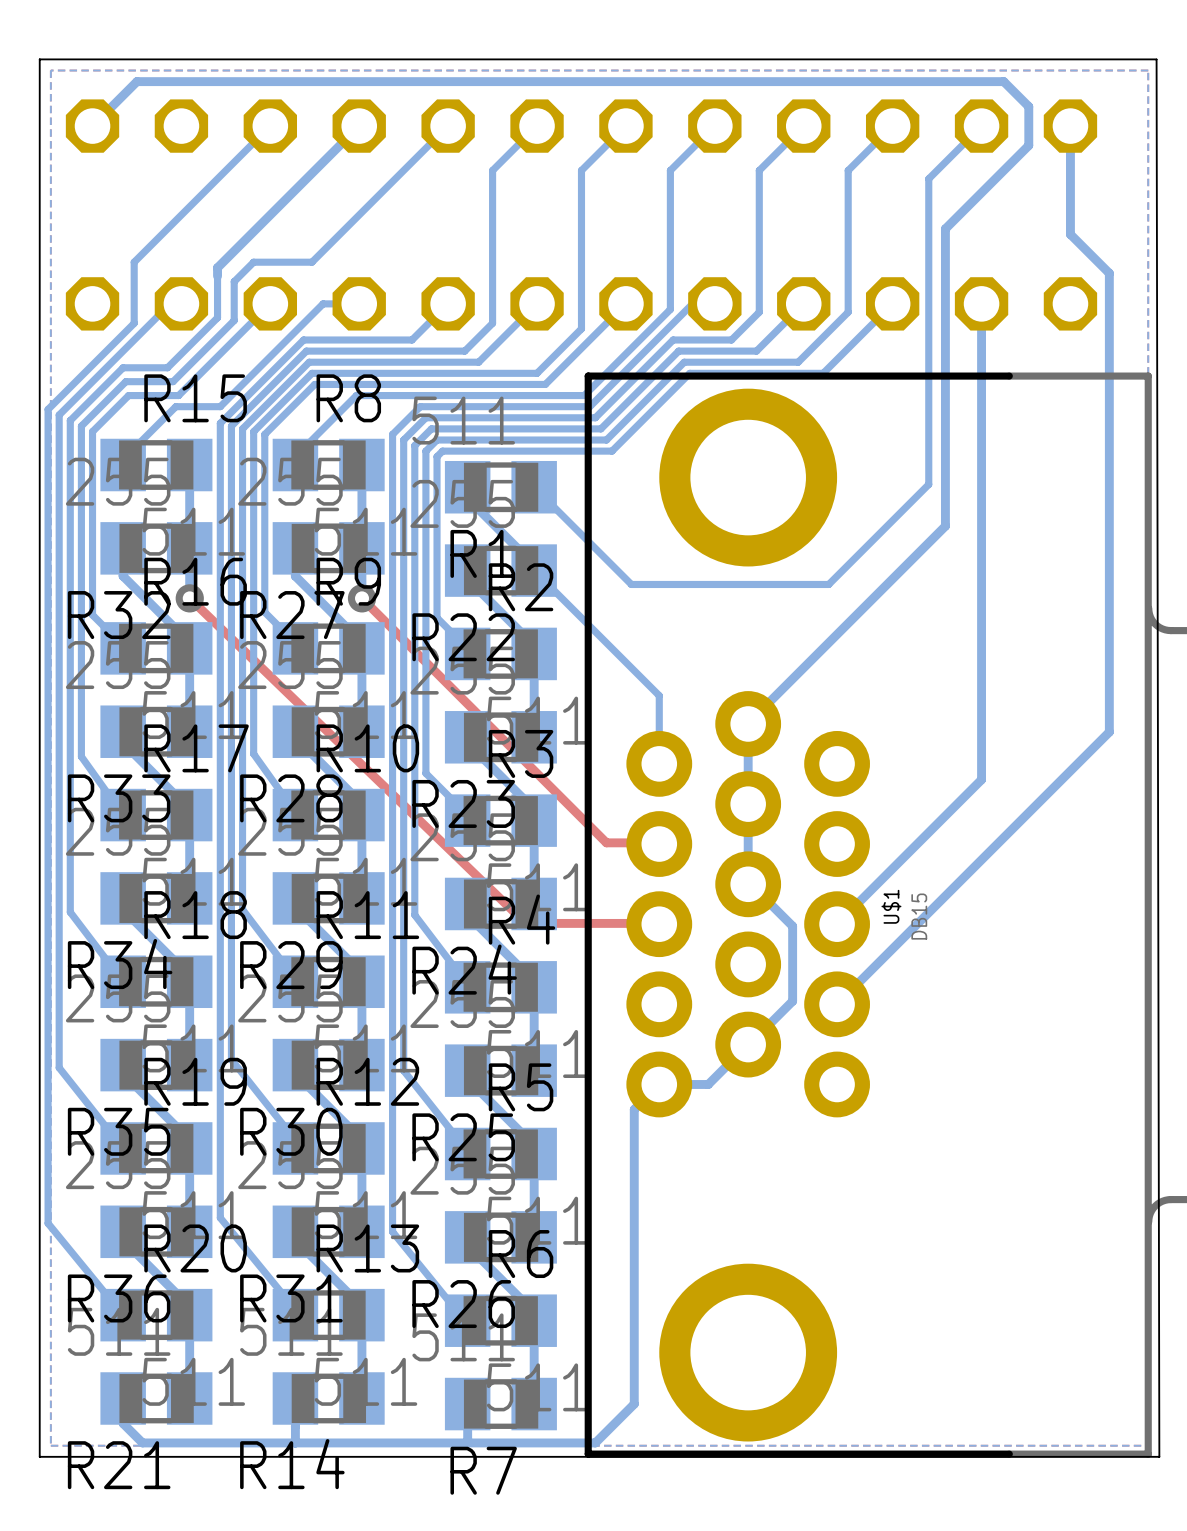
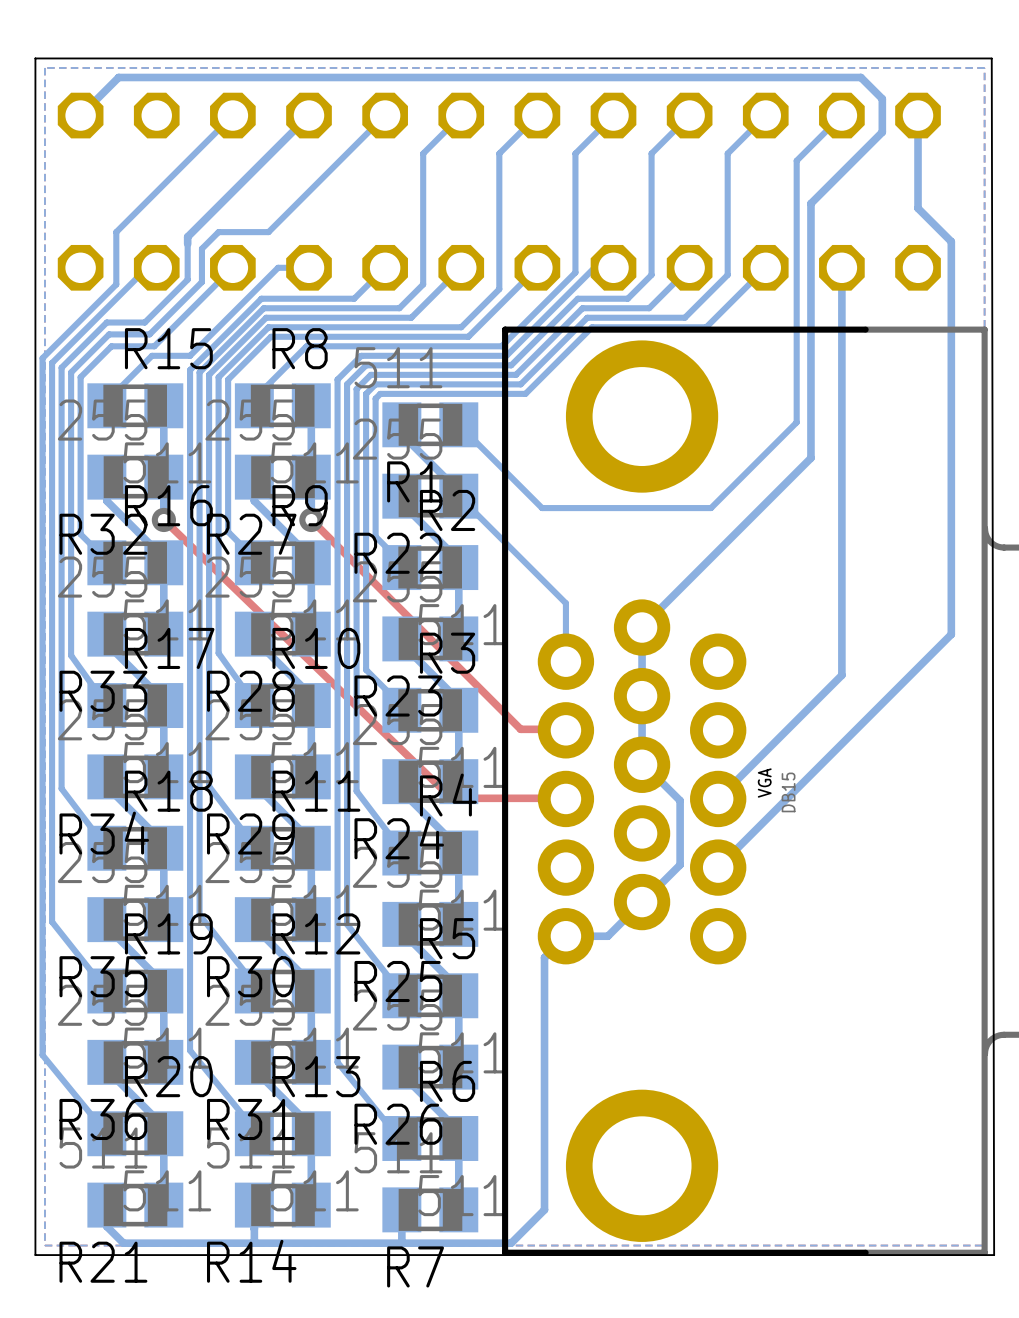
U$1 name: U$1 (891, 906) -> VGA (764, 783)

